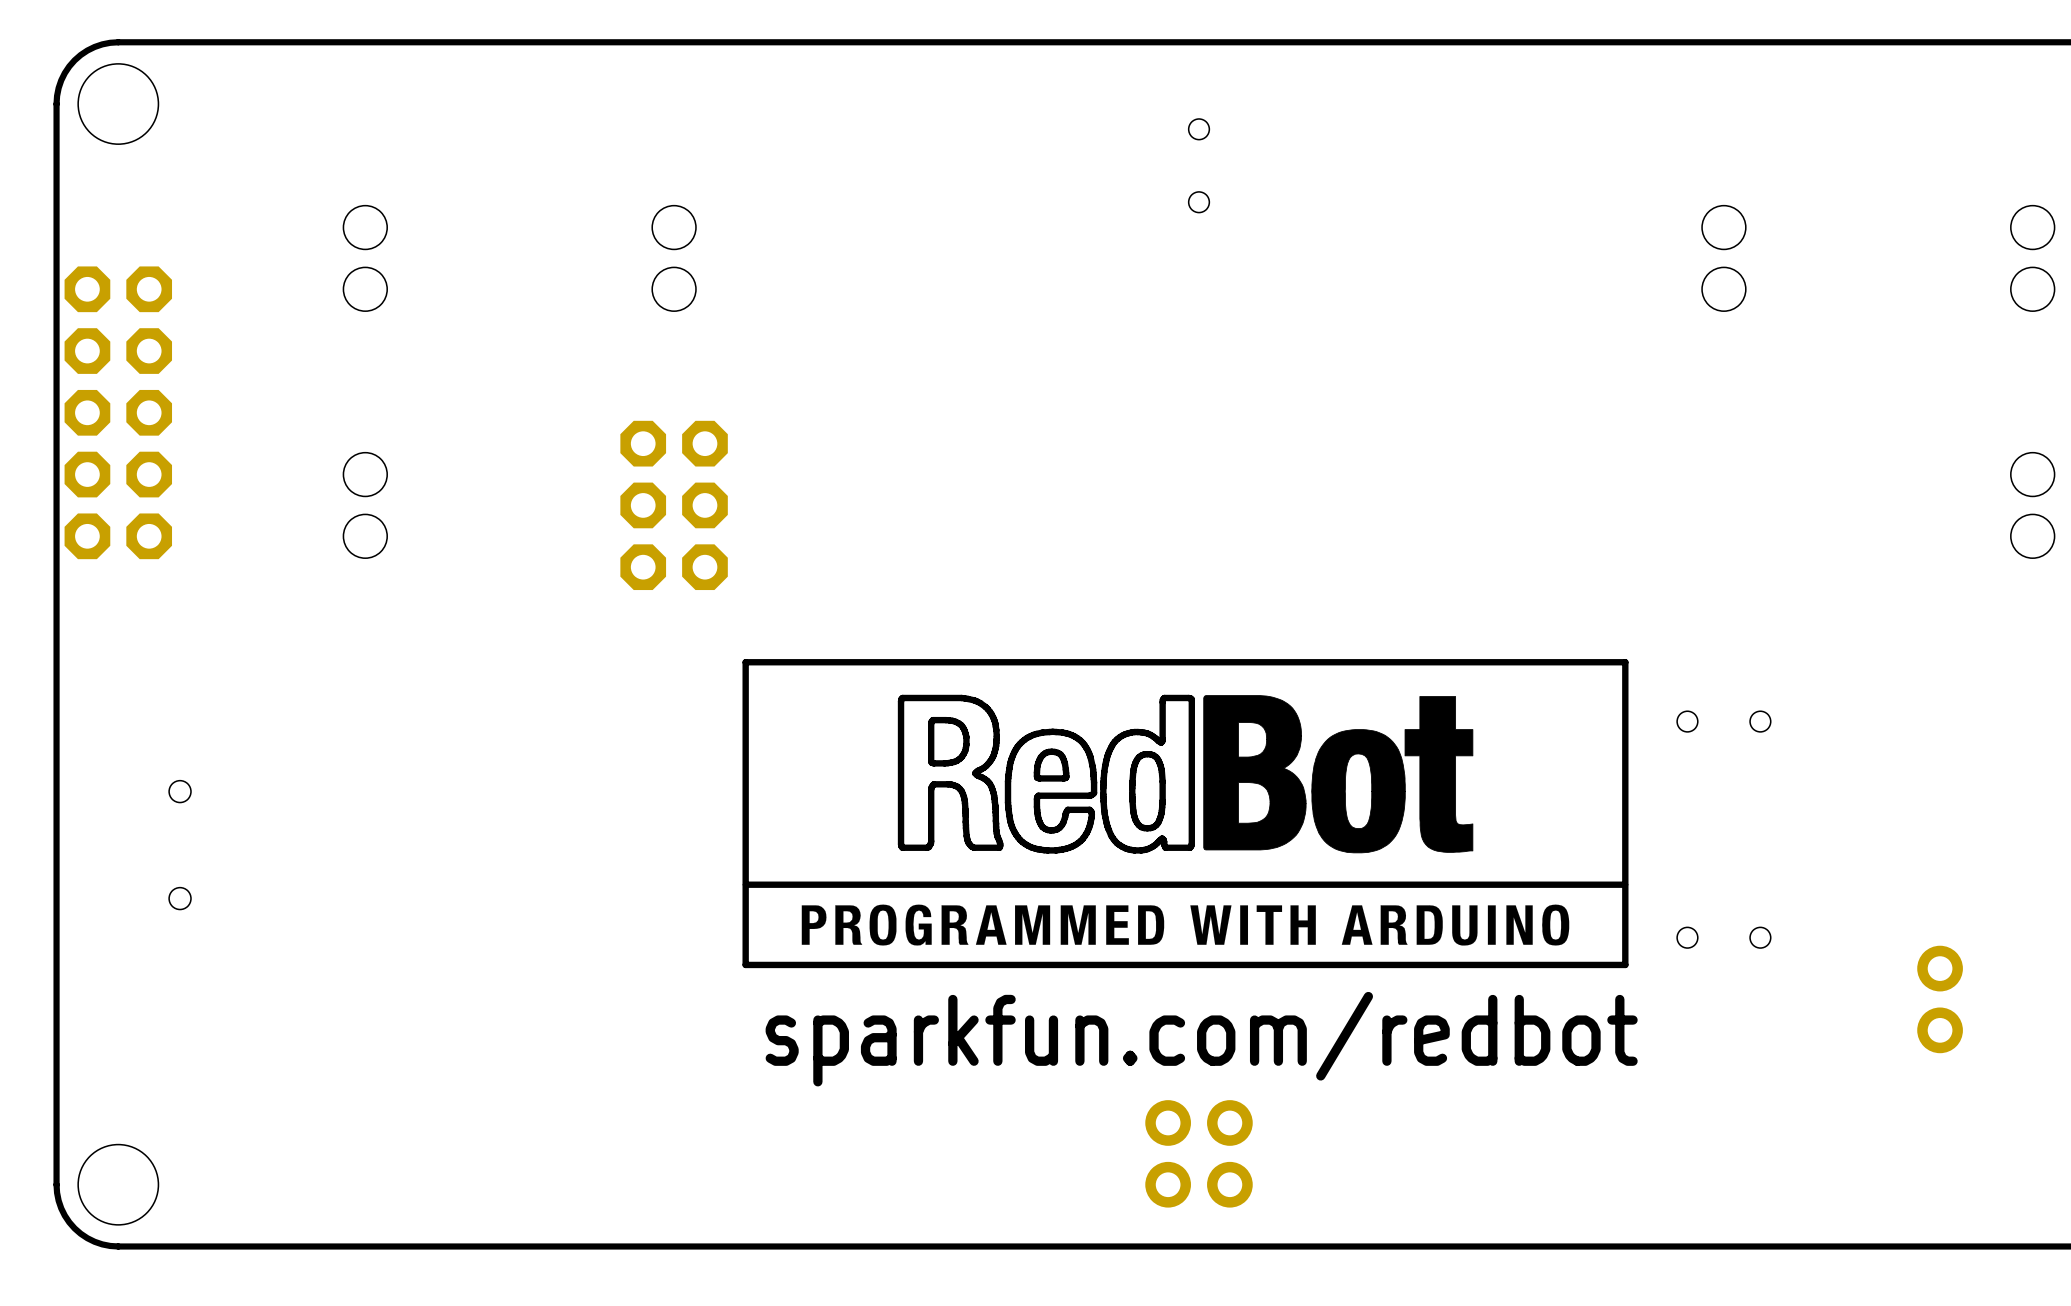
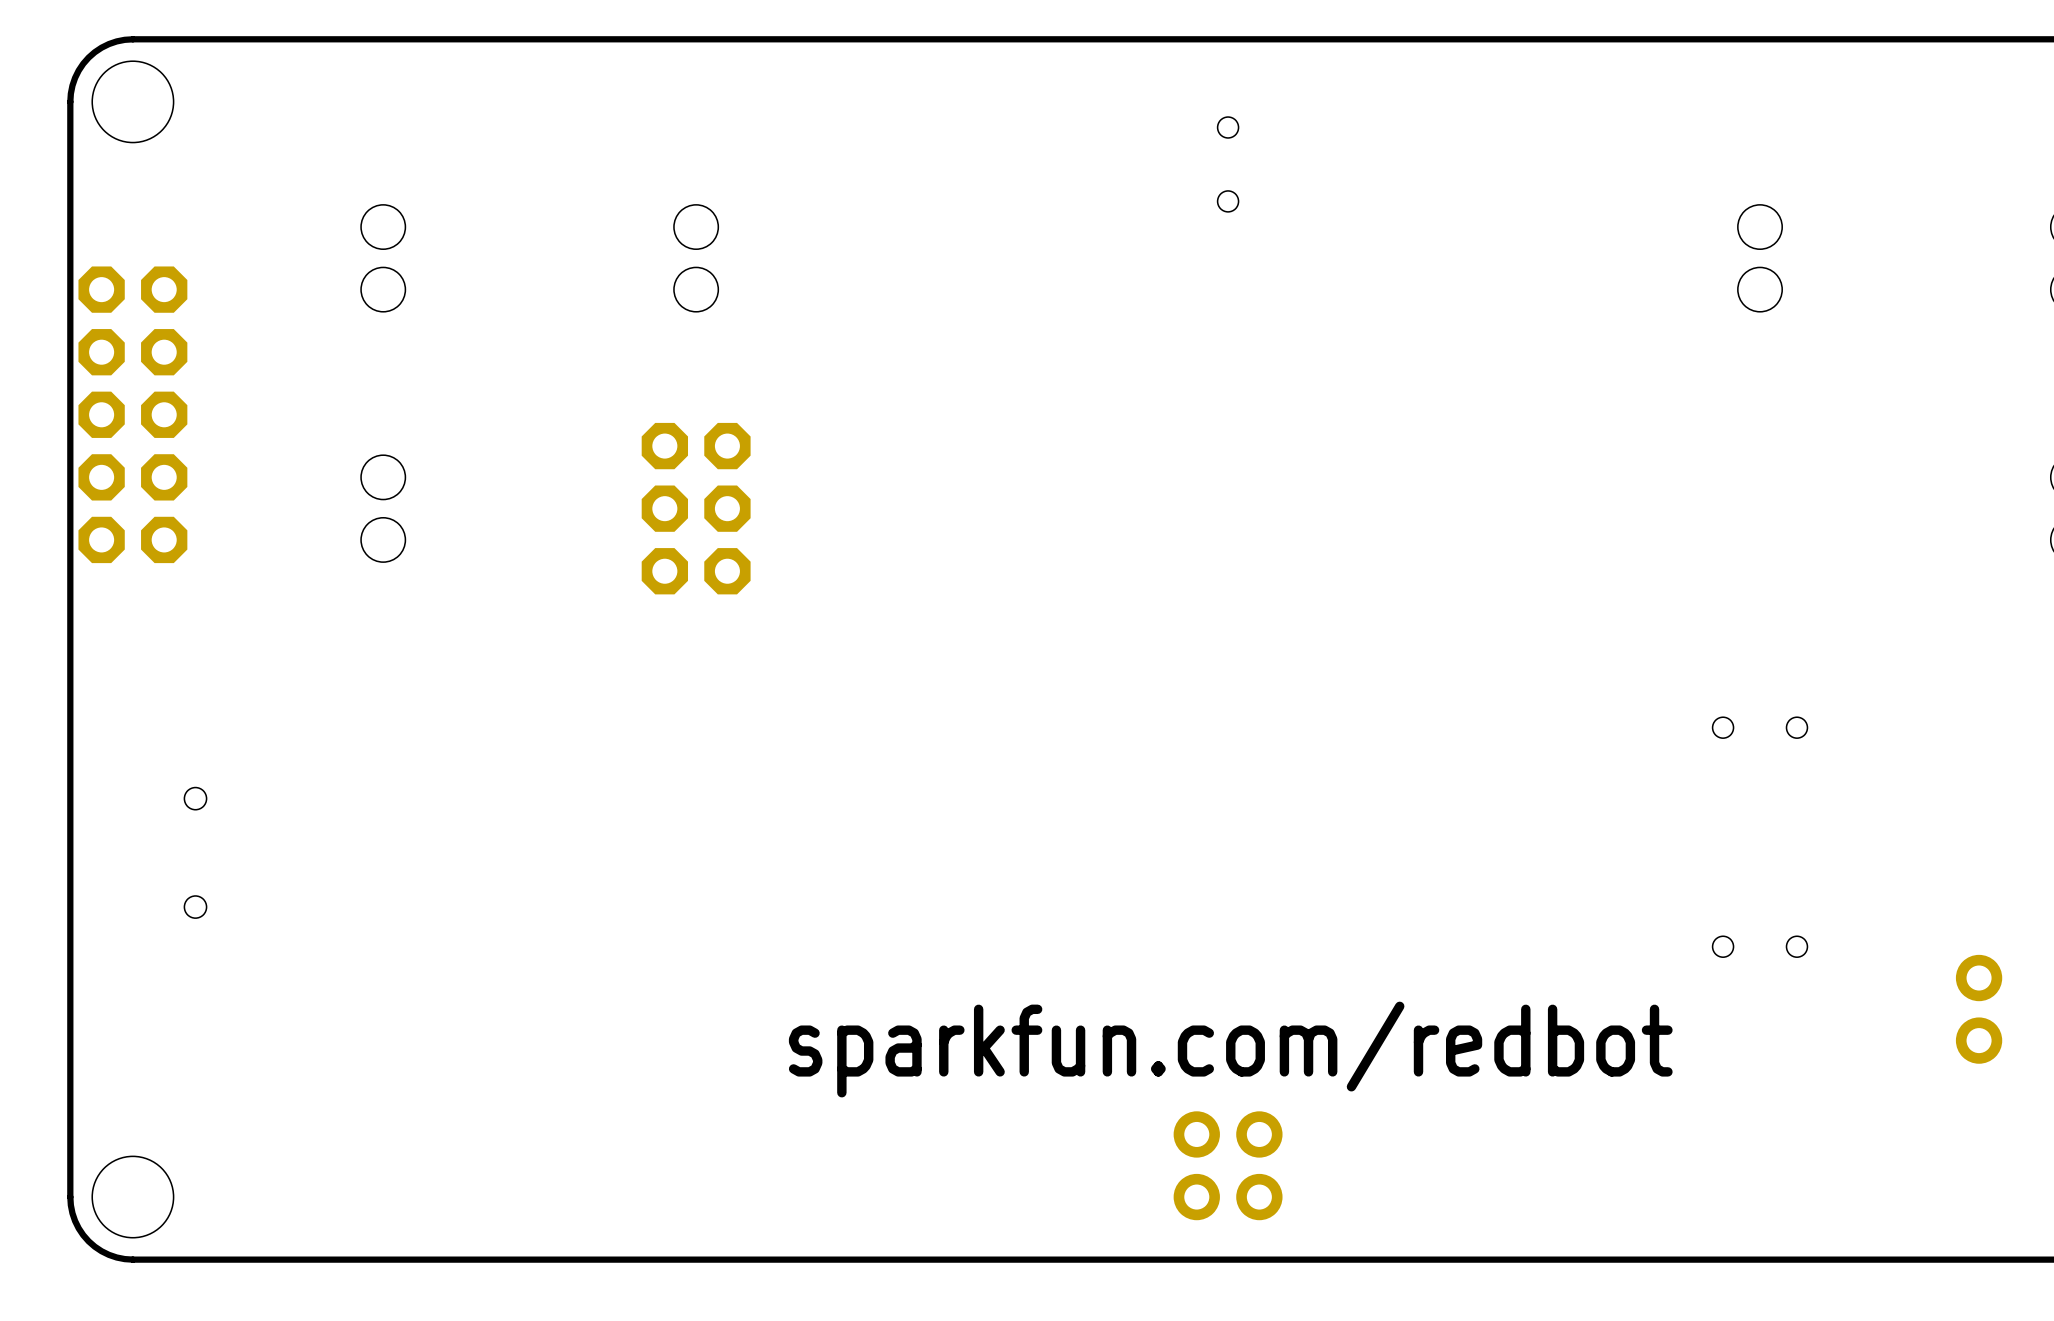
drawing: [742, 659, 1629, 969] -> none

